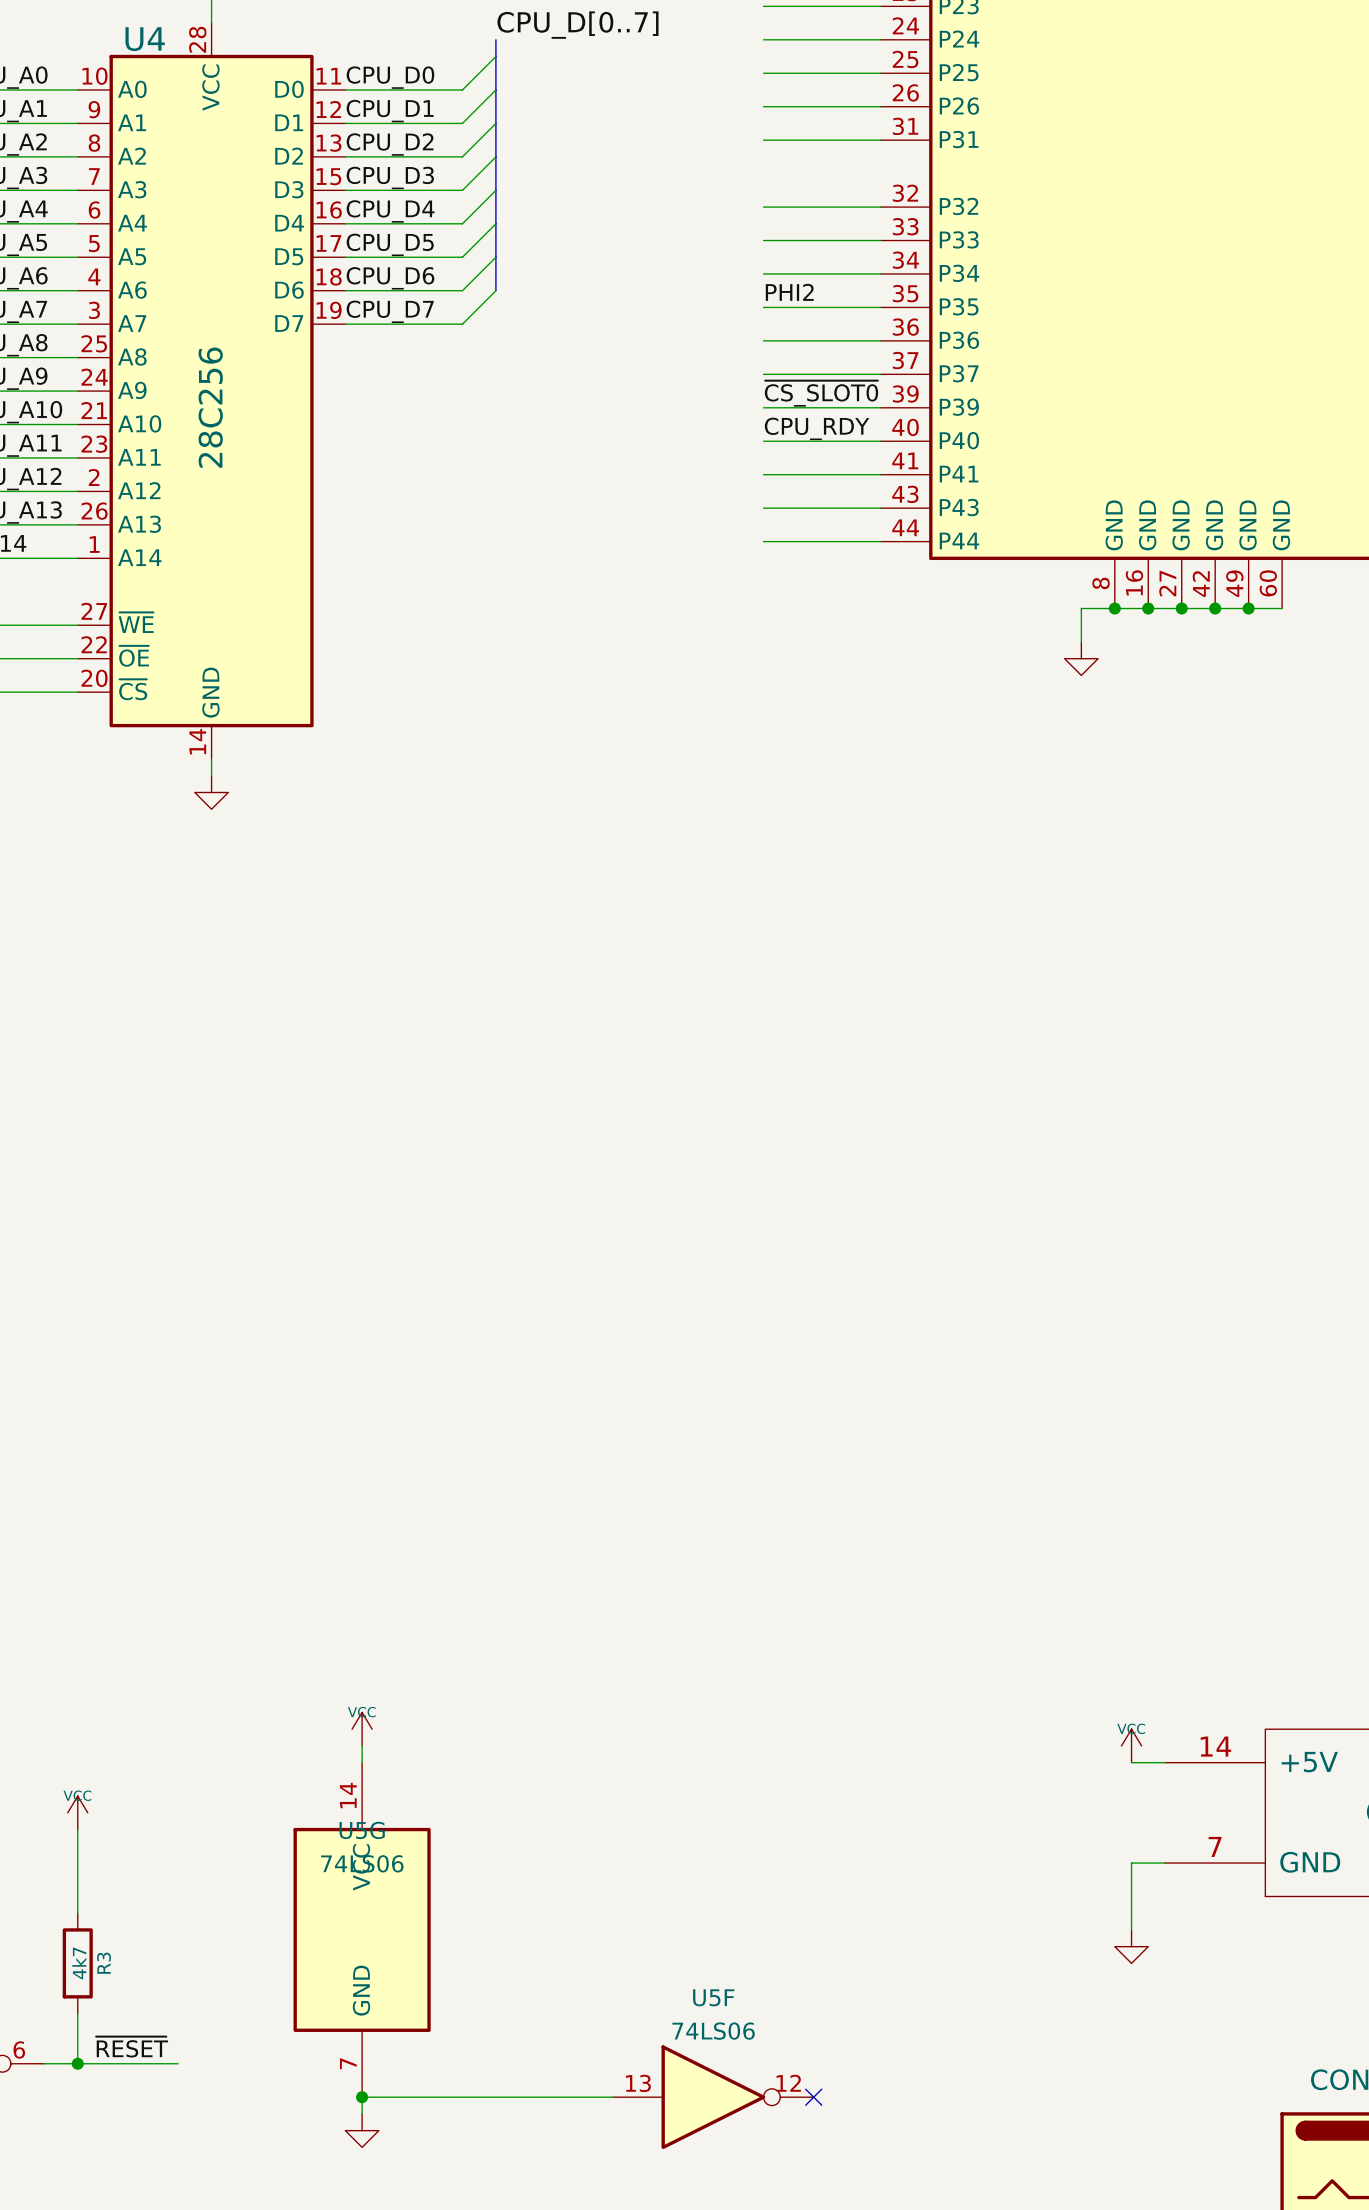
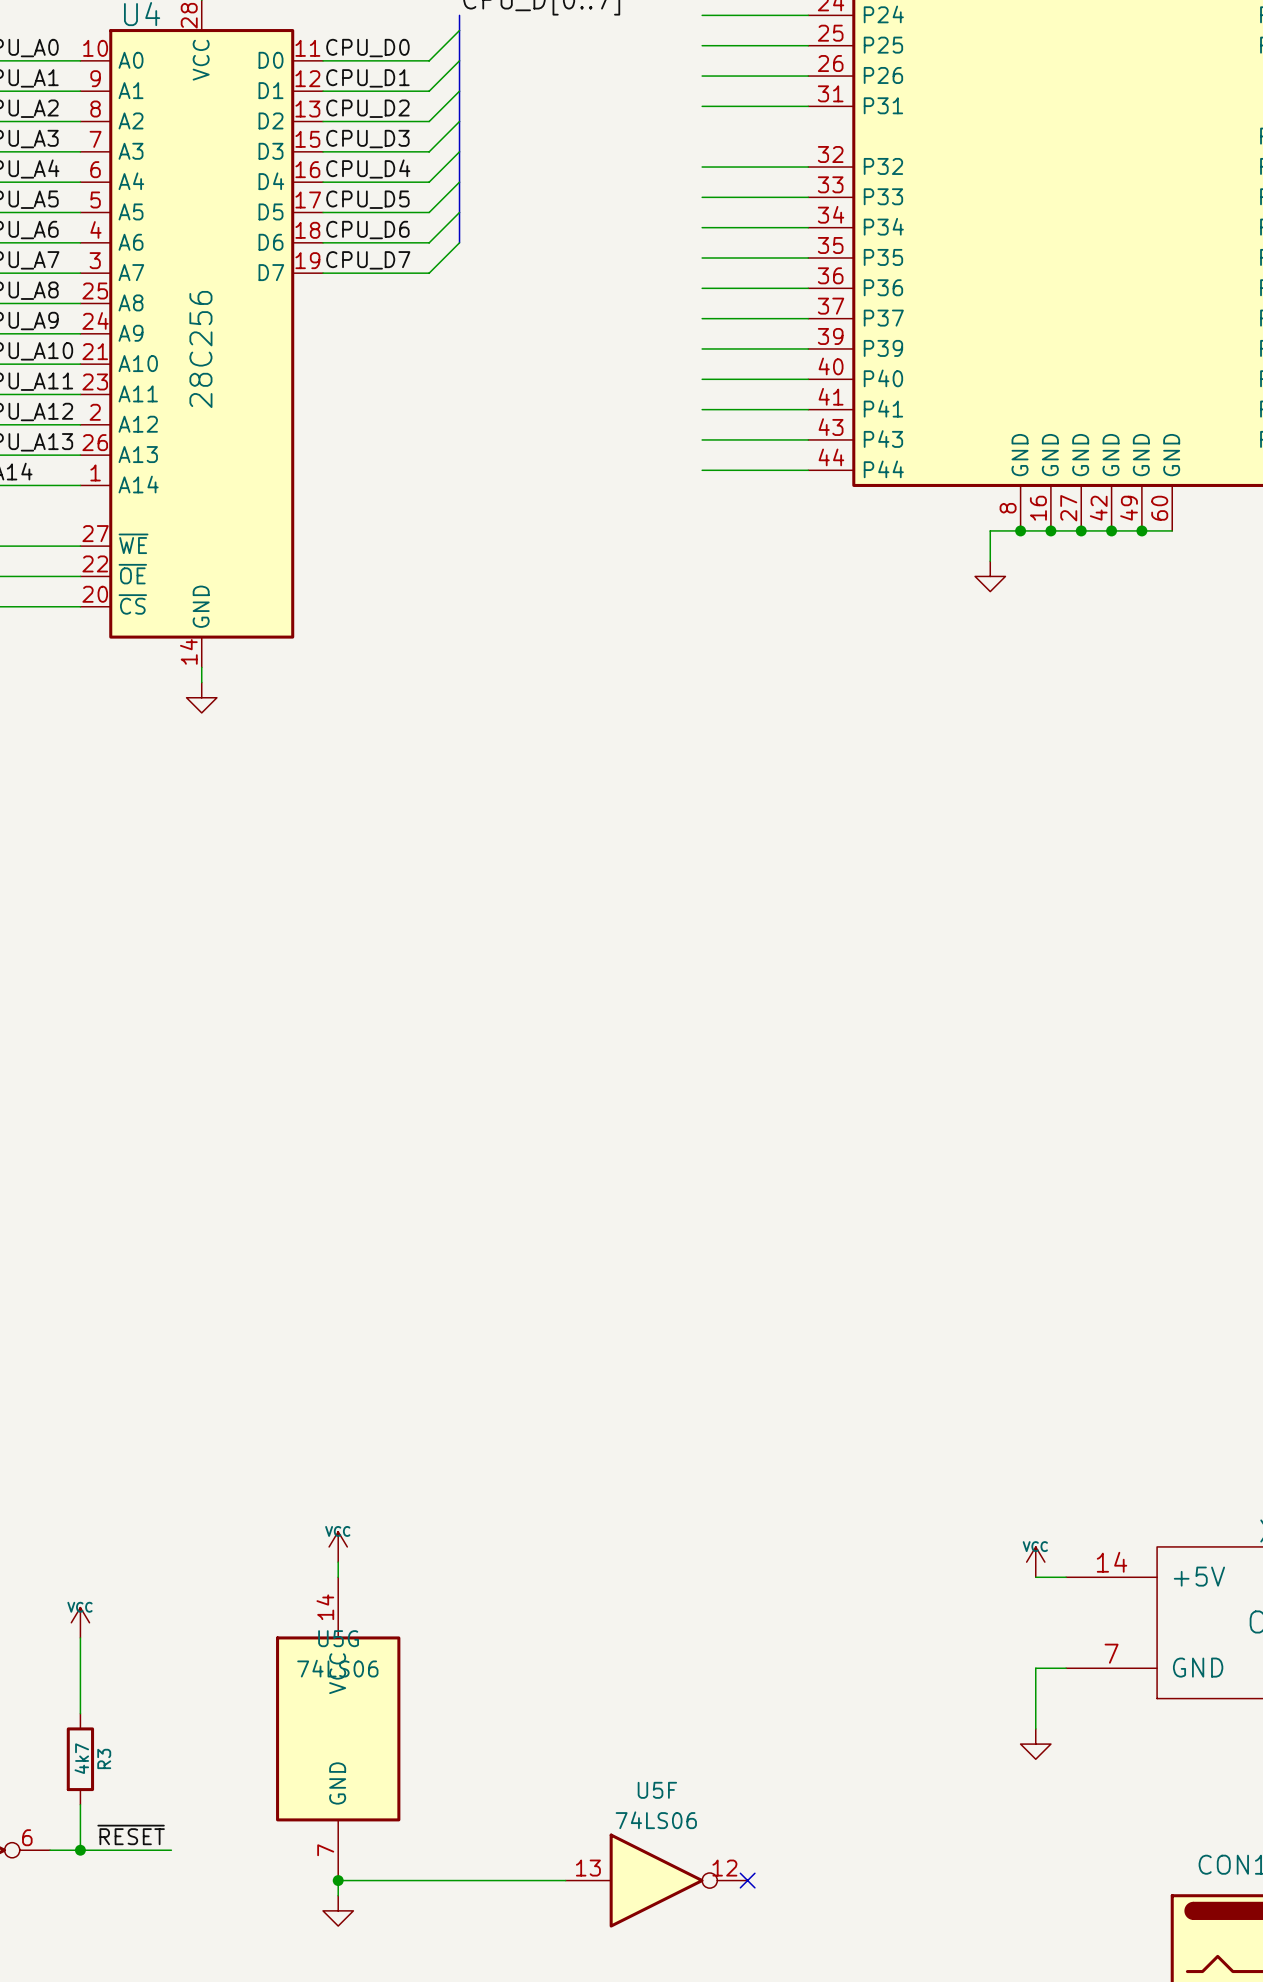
label: PHI2 (789, 292) -> none
label: ~{CS_SLOT0} (821, 393) -> none
label: CPU_RDY (817, 428) -> none

